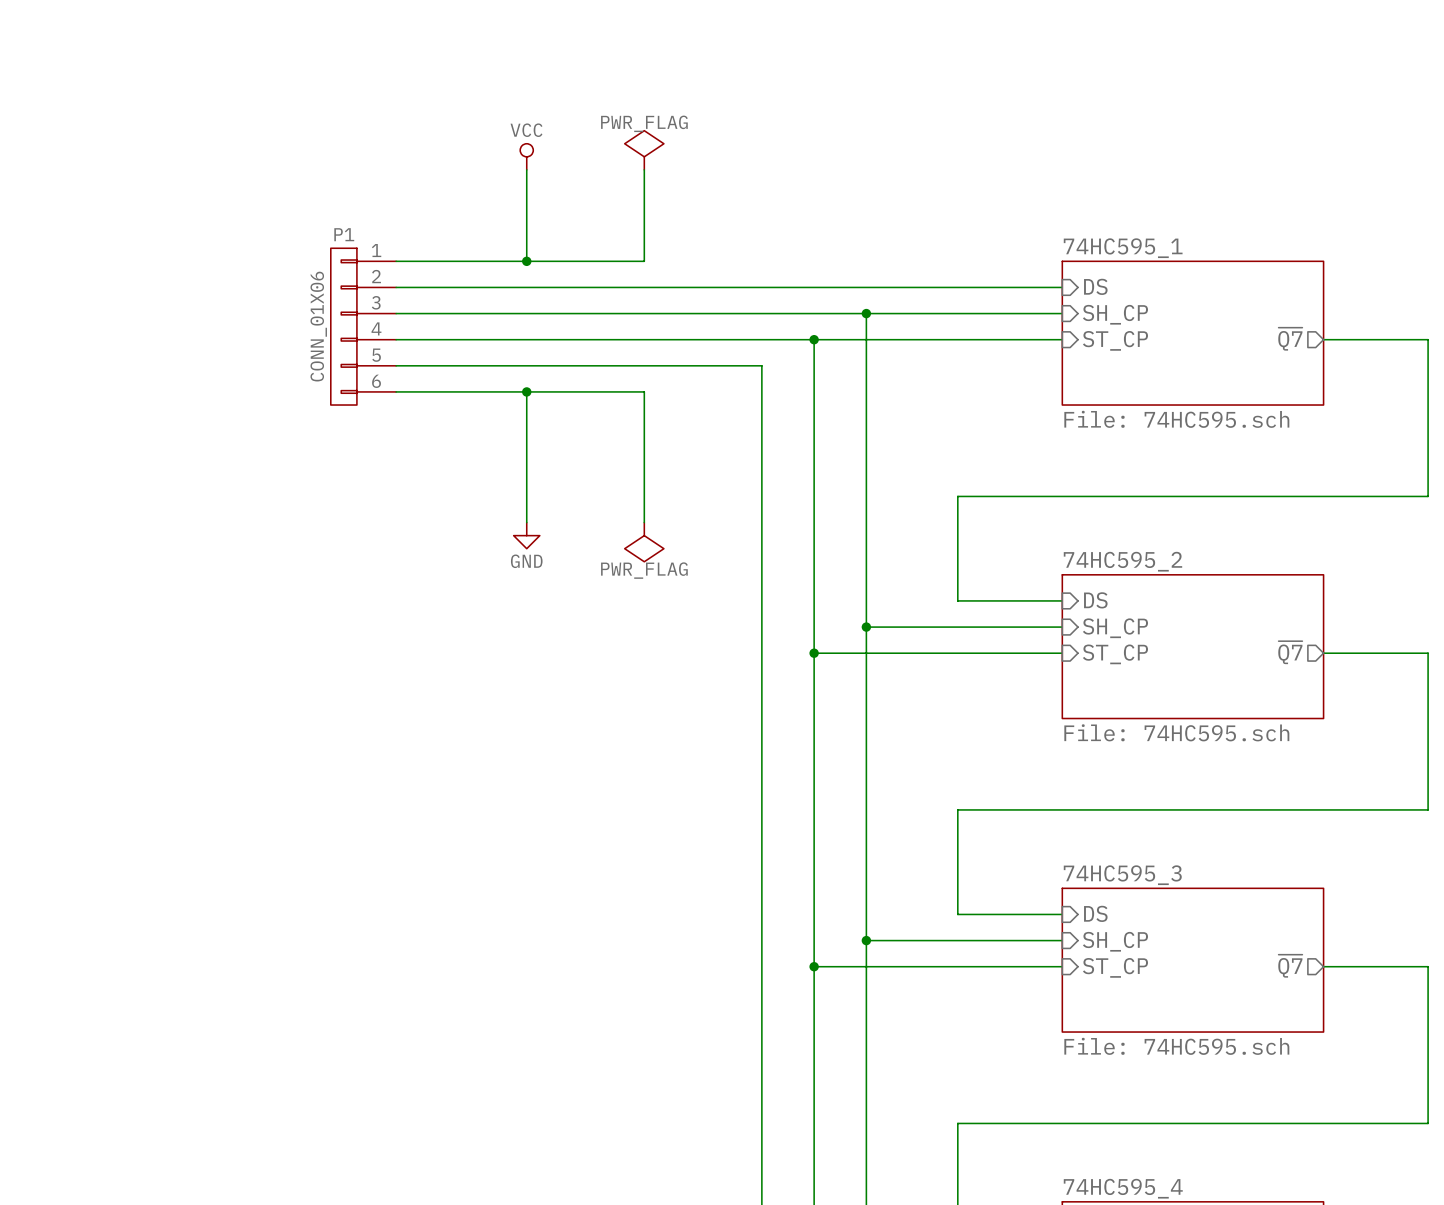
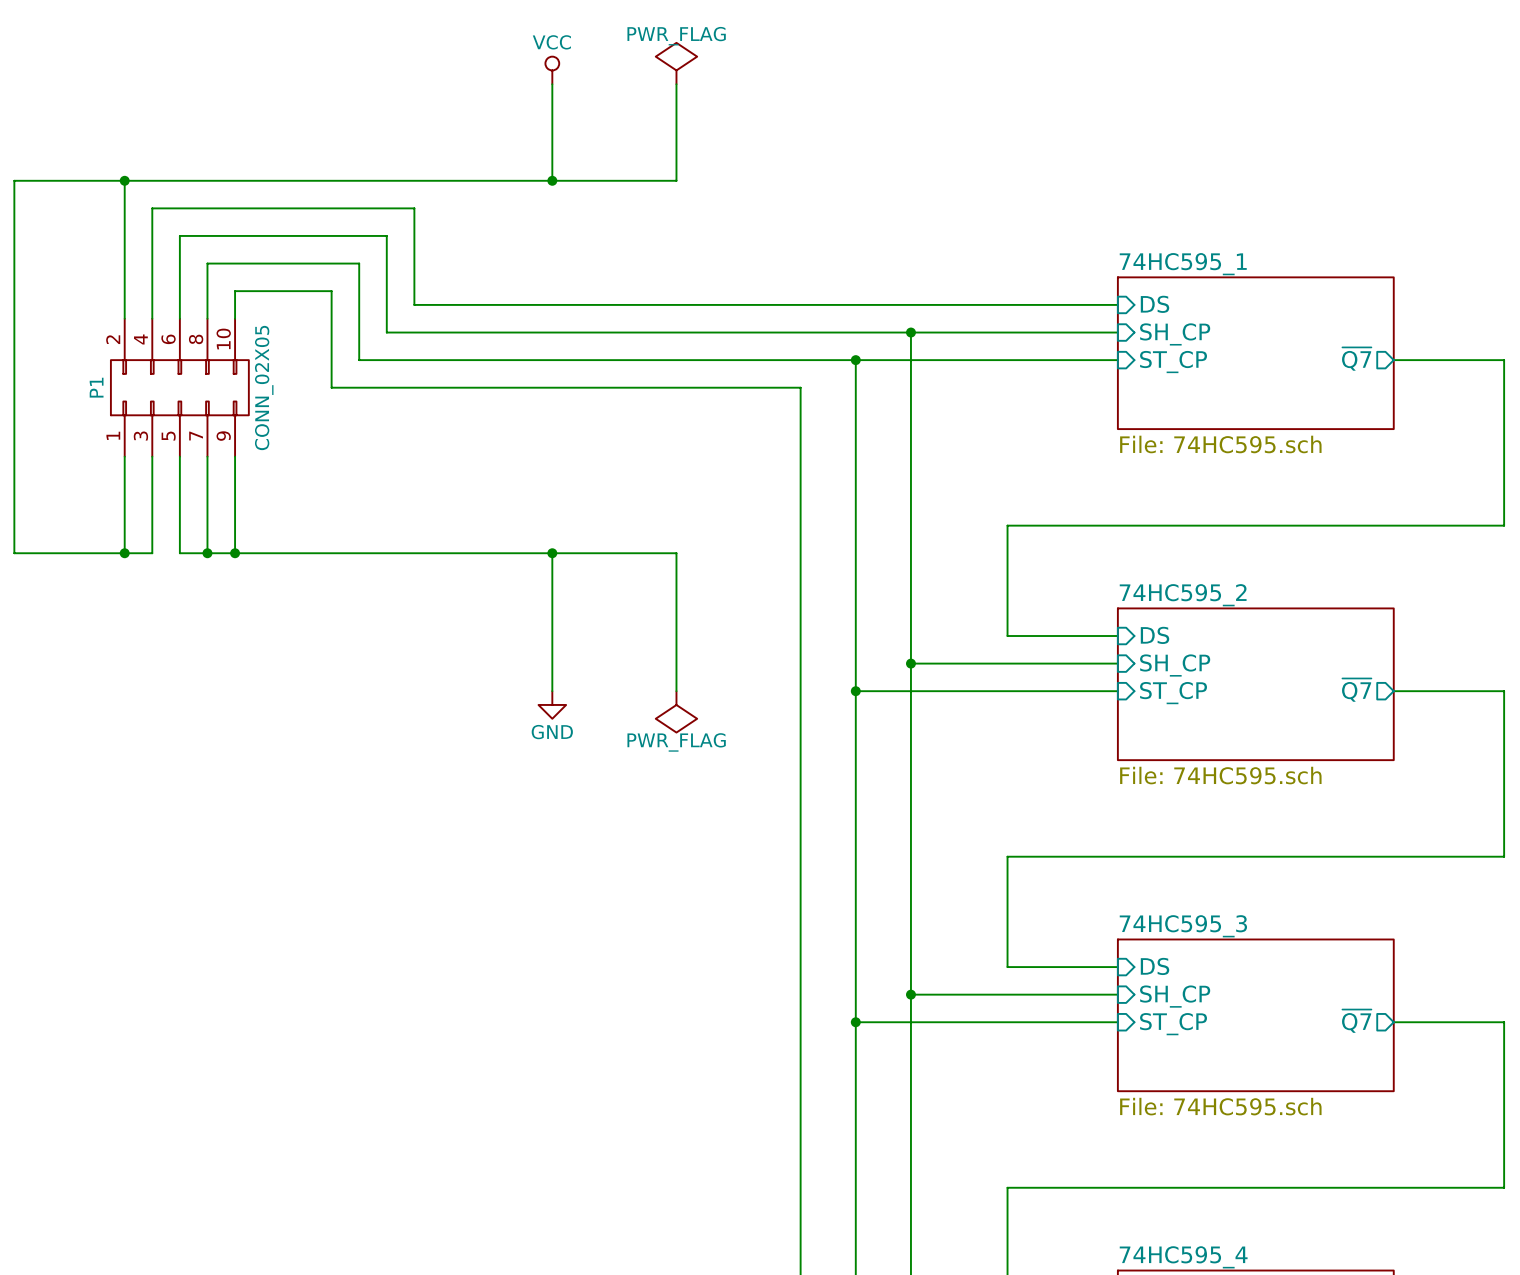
wire: none -> (676, 84) (676, 180) (14, 180) (14, 553) (152, 553) (152, 456)
power symbol position: PWR_FLAG (644, 150) -> PWR_FLAG (676, 63)
power symbol position: VCC (526, 156) -> VCC (552, 70)
wire: none -> (124, 180) (124, 318)
junction: none -> (124, 180)
wire: (526, 169) (526, 261) -> (552, 180) (552, 84)
junction: none -> (552, 180)
wire: (644, 169) (644, 261) (396, 261) -> none
P1 name position: P1 (344, 234) -> P1 (96, 387)
P1 symbol: [330, 248, 397, 406] -> [110, 318, 249, 457]
junction: (526, 261) -> none
wire: none -> (414, 304) (414, 208) (152, 208) (152, 318)
wire: none -> (179, 318) (179, 235) (386, 235) (386, 332) (414, 332)
wire: none -> (207, 318) (207, 263) (359, 263) (359, 360) (414, 360)
wire: none -> (235, 318) (235, 291) (331, 291) (331, 387) (414, 387)
P1 value: CONN_01X06 (318, 326) -> CONN_02X05 (264, 388)
wire: (396, 391) (644, 391) (644, 522) -> none
wire: (526, 391) (526, 522) -> (552, 691) (552, 553)
junction: (526, 391) -> none
wire: none -> (124, 456) (124, 553)
wire: none -> (179, 456) (179, 553) (676, 553) (676, 691)
wire: none -> (207, 456) (207, 553)
wire: none -> (235, 456) (235, 553)
junction: none -> (124, 553)
junction: none -> (207, 553)
junction: none -> (235, 553)
junction: none -> (552, 553)
power symbol position: GND (526, 535) -> GND (552, 704)
power symbol position: PWR_FLAG (644, 542) -> PWR_FLAG (676, 711)

